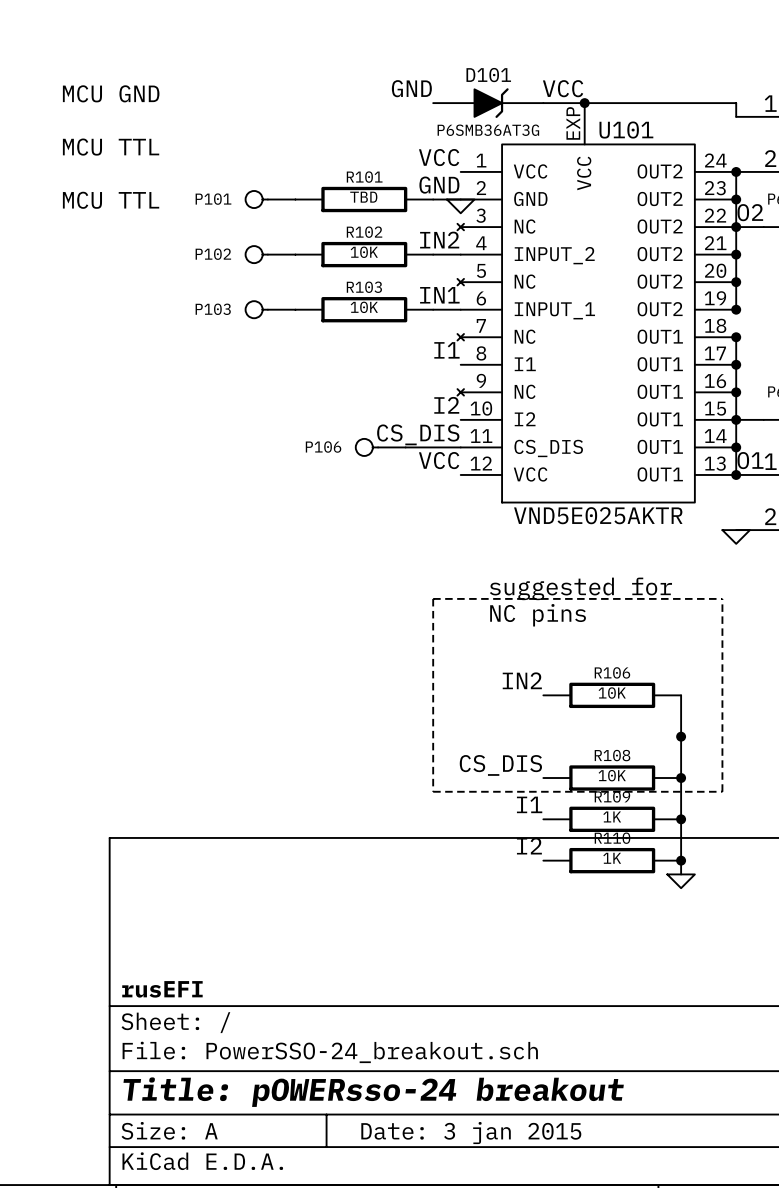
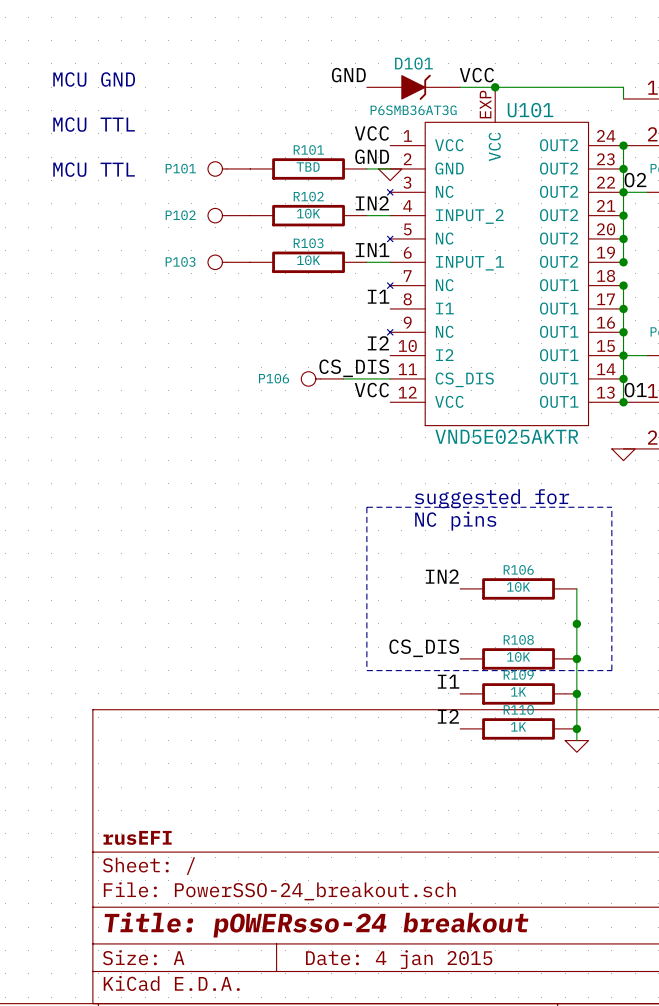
title block: Date: 3 jan 2015 (471, 1133) -> Date: 4 jan 2015 (399, 959)

